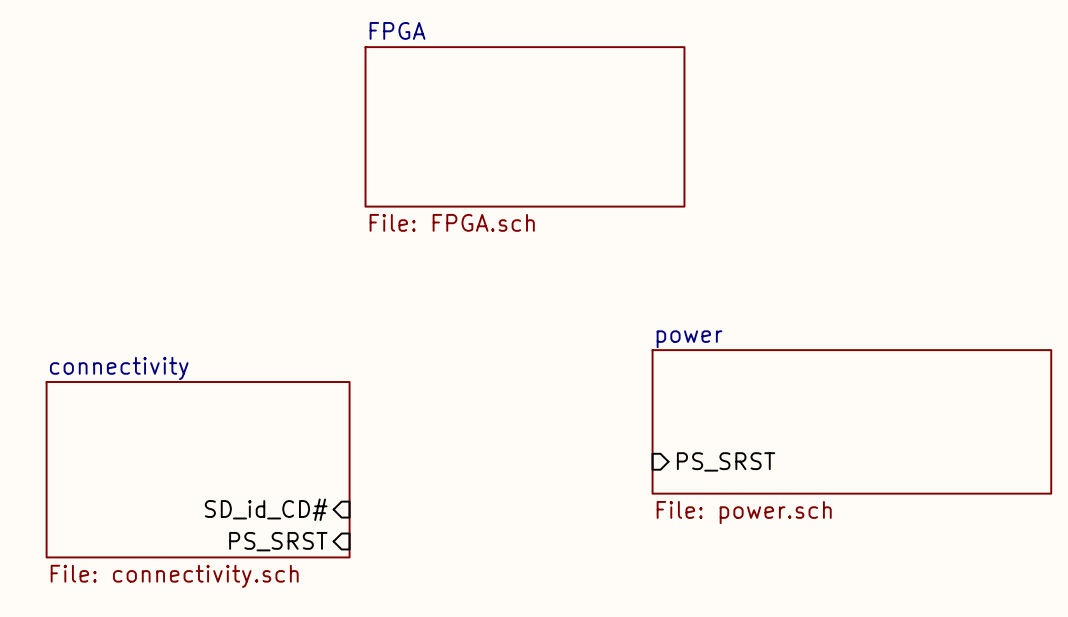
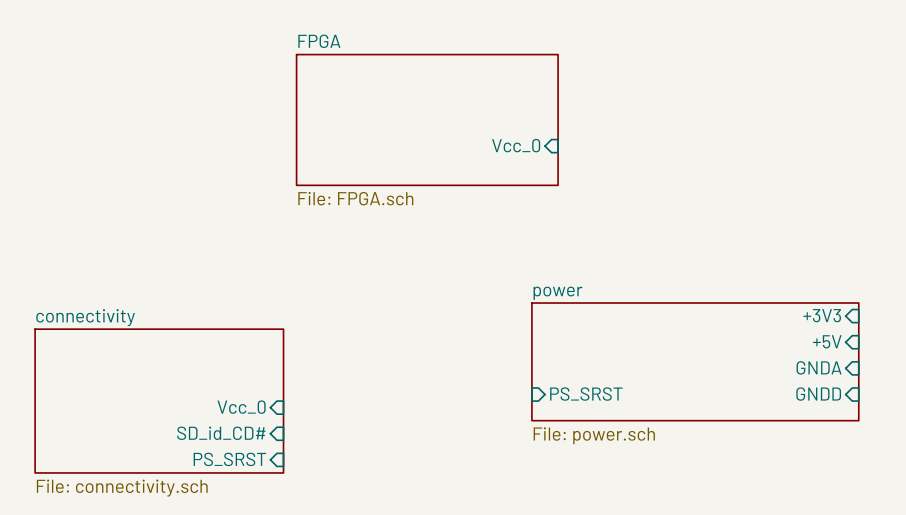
sheet pin: none -> Vcc_0 (516, 145)
sheet pin: none -> +3V3 (822, 315)
sheet pin: none -> +5V (827, 341)
sheet pin: none -> GNDA (819, 367)
sheet pin: none -> GNDD (818, 394)
sheet pin: none -> Vcc_0 (241, 407)

